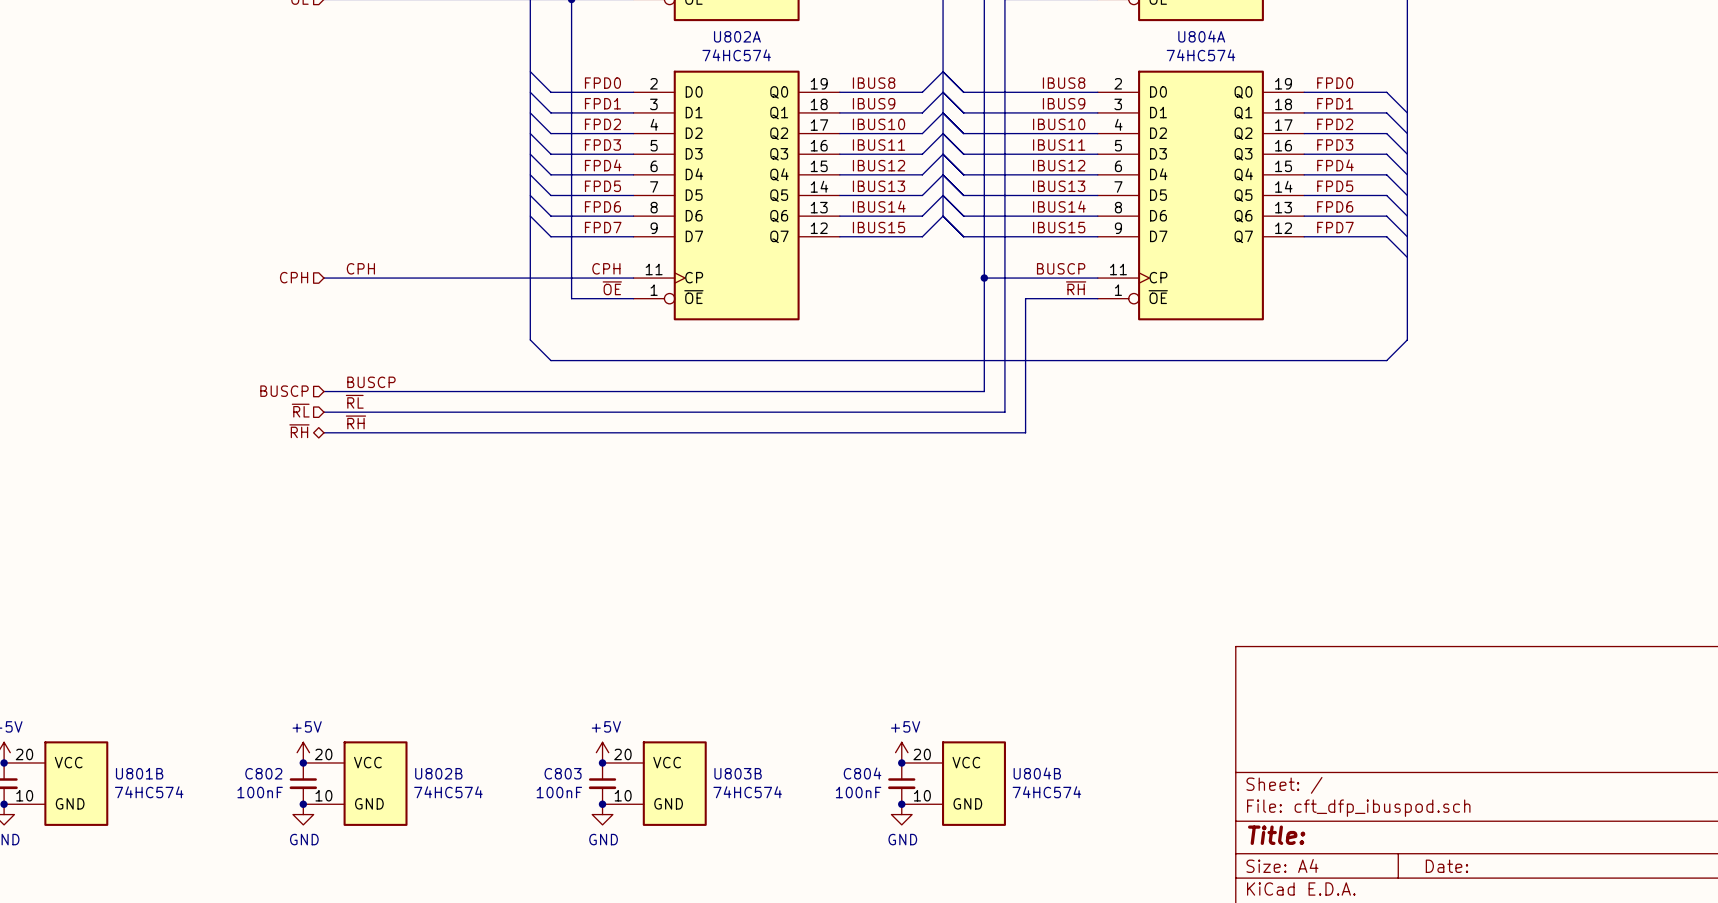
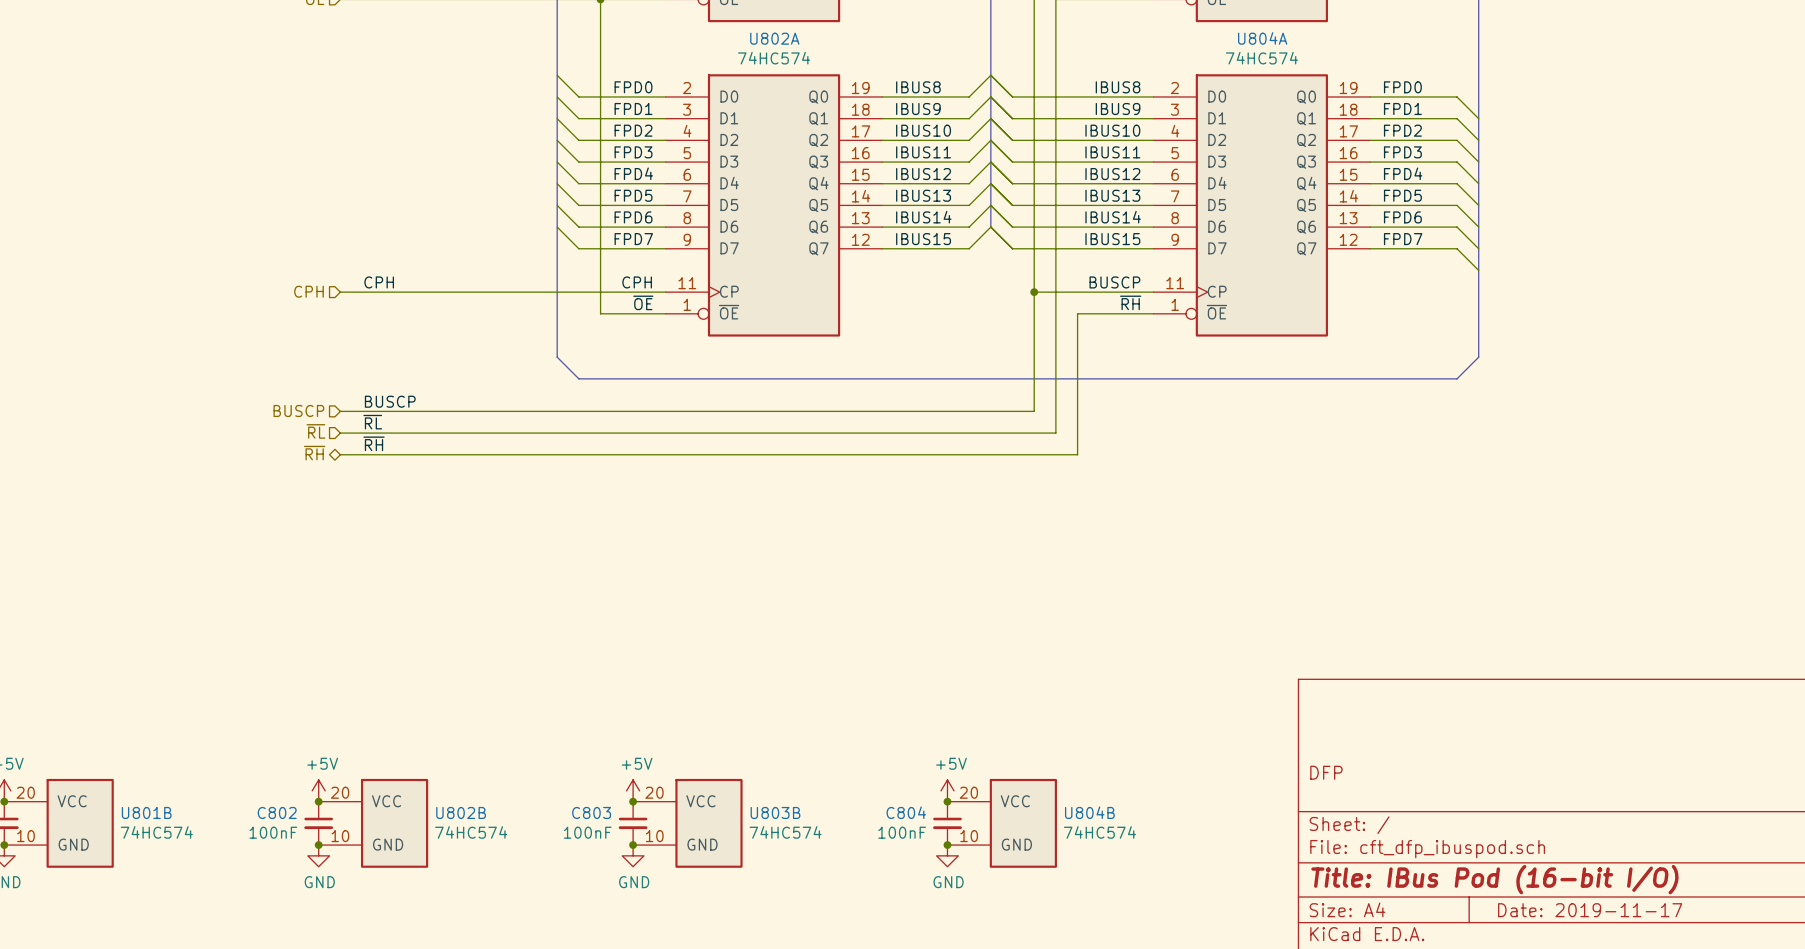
title block: none -> DFP (1326, 772)
title block: Title: (1276, 835) -> Title: IBus Pod (16-bit I/O) (1494, 879)
title block: Date: (1446, 866) -> Date: 2019-11-17 (1590, 910)

